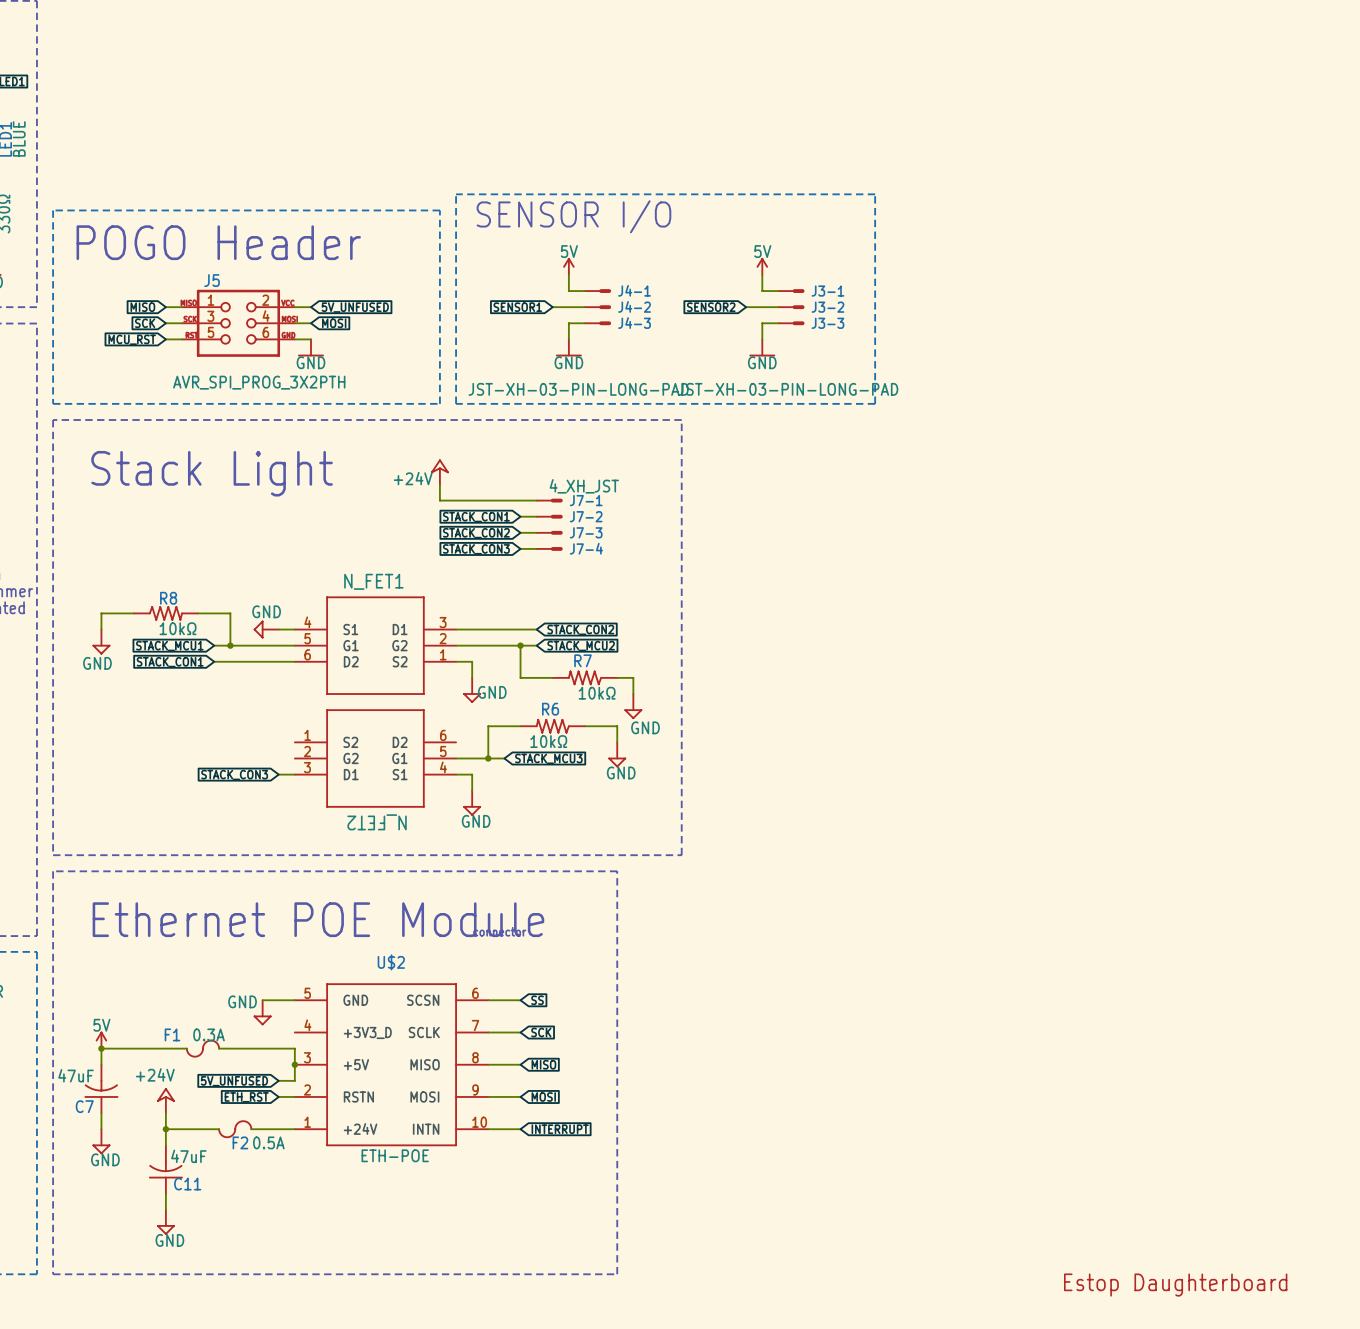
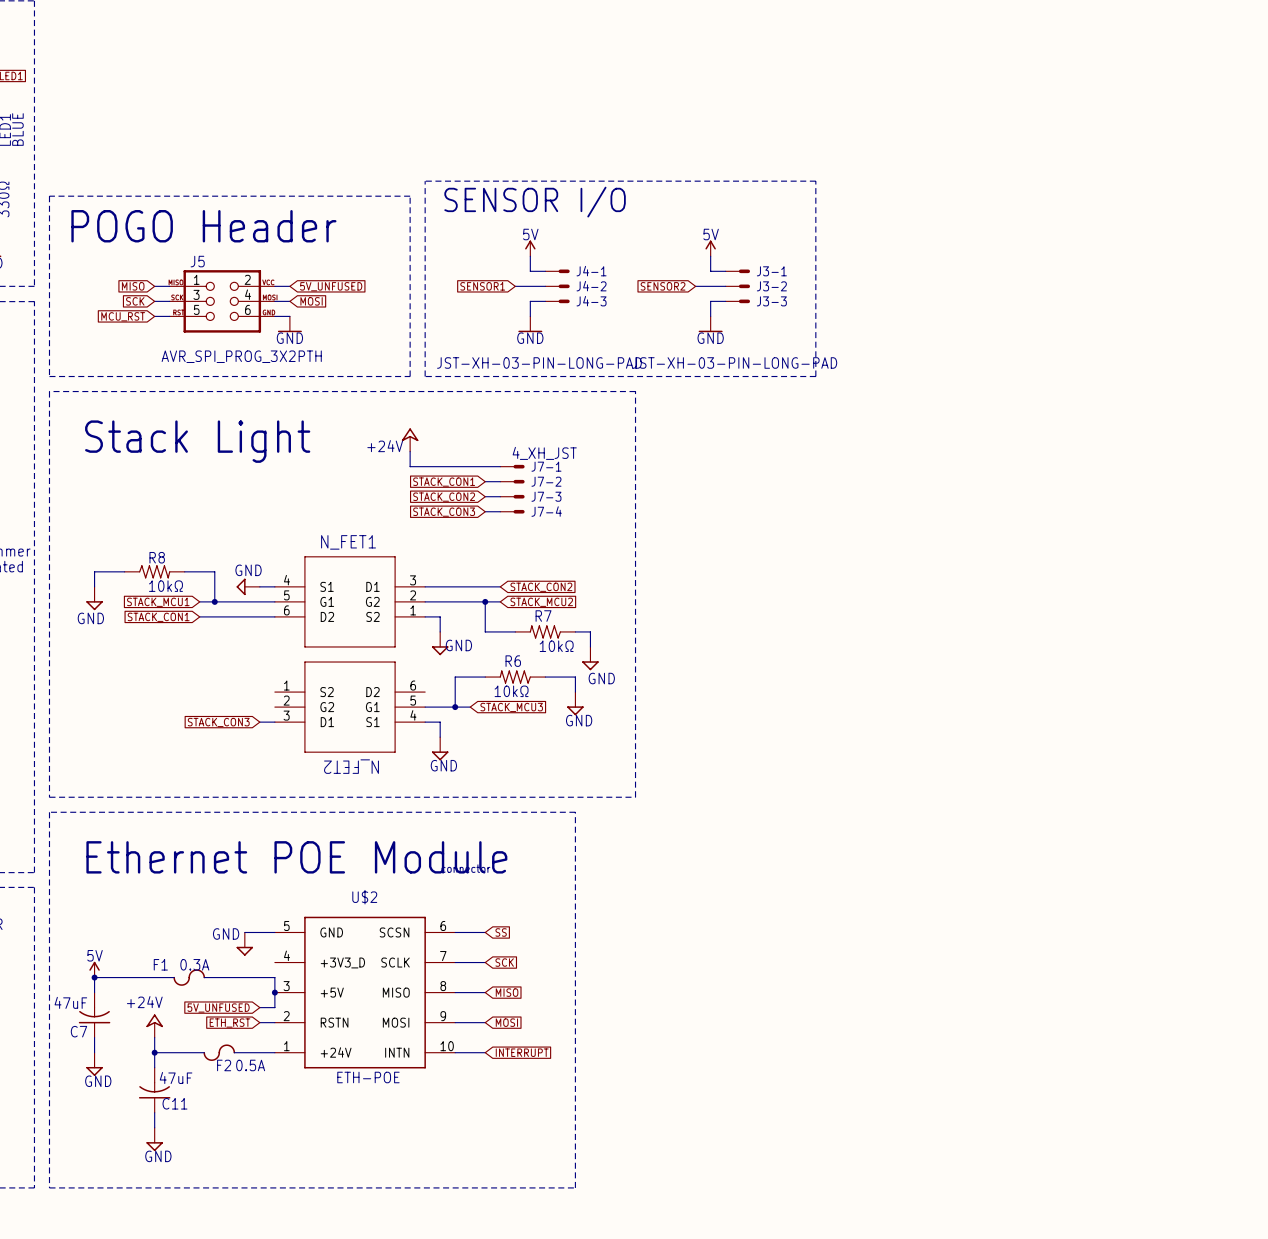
text: Estop Daughterboard (1175, 1285) -> none

